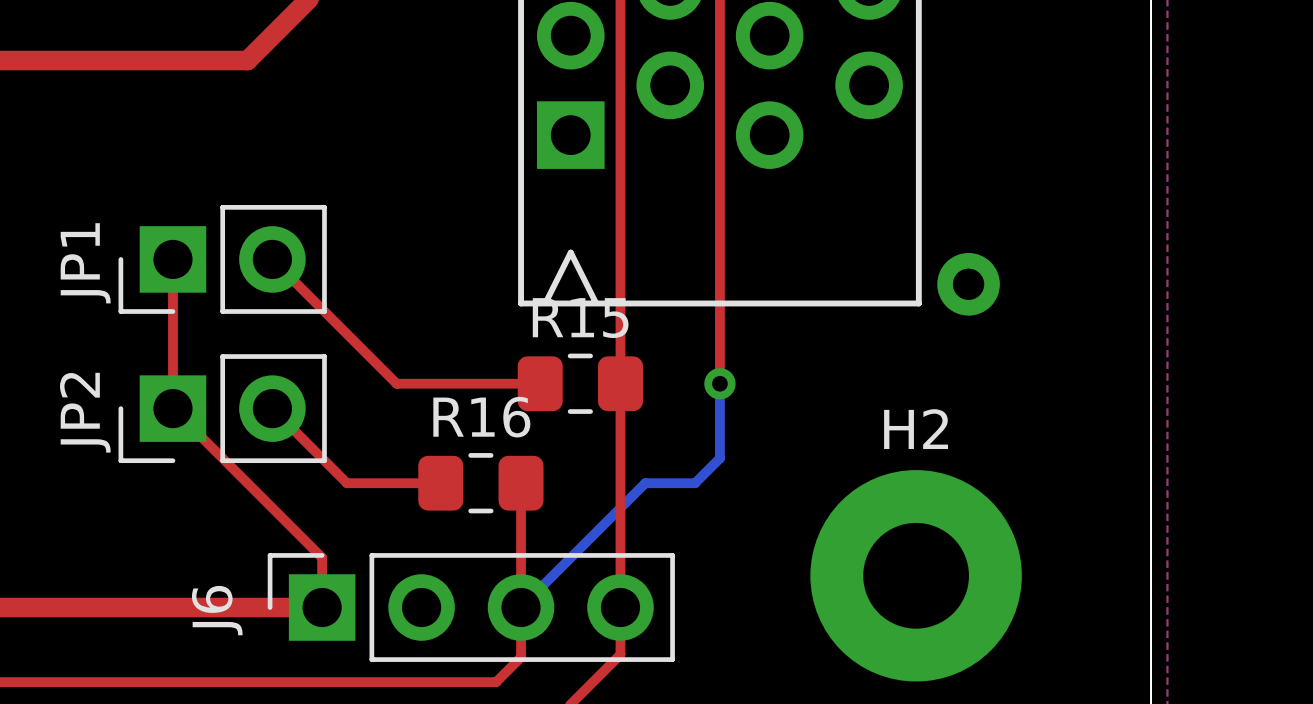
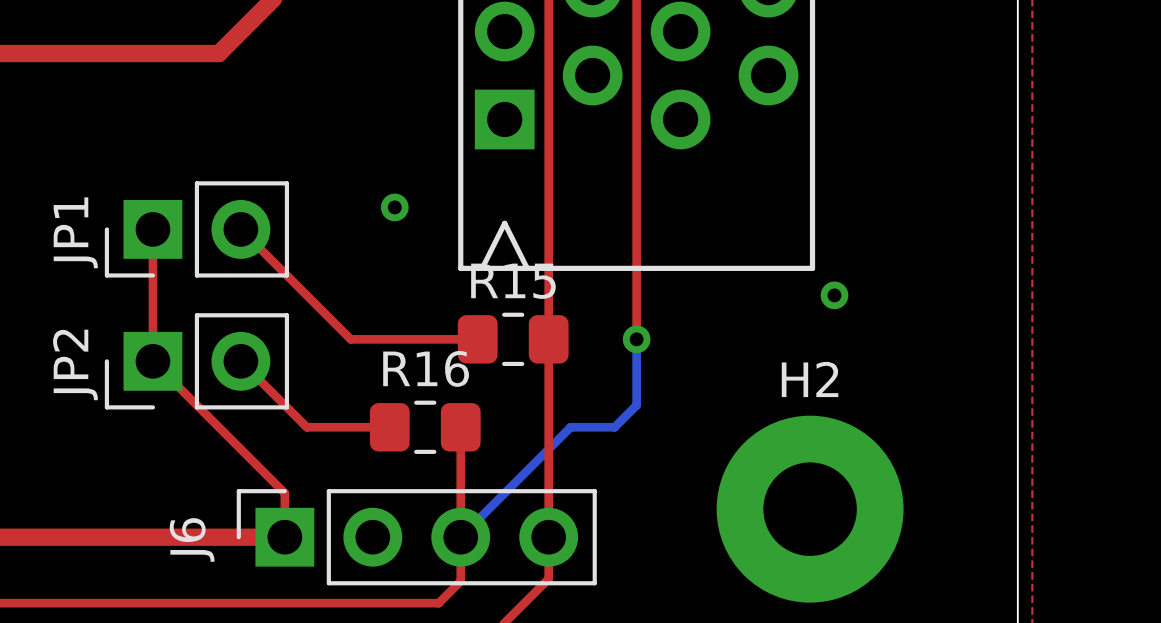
via: none -> (394, 207)
via: (968, 284) -> none
via: none -> (834, 295)

